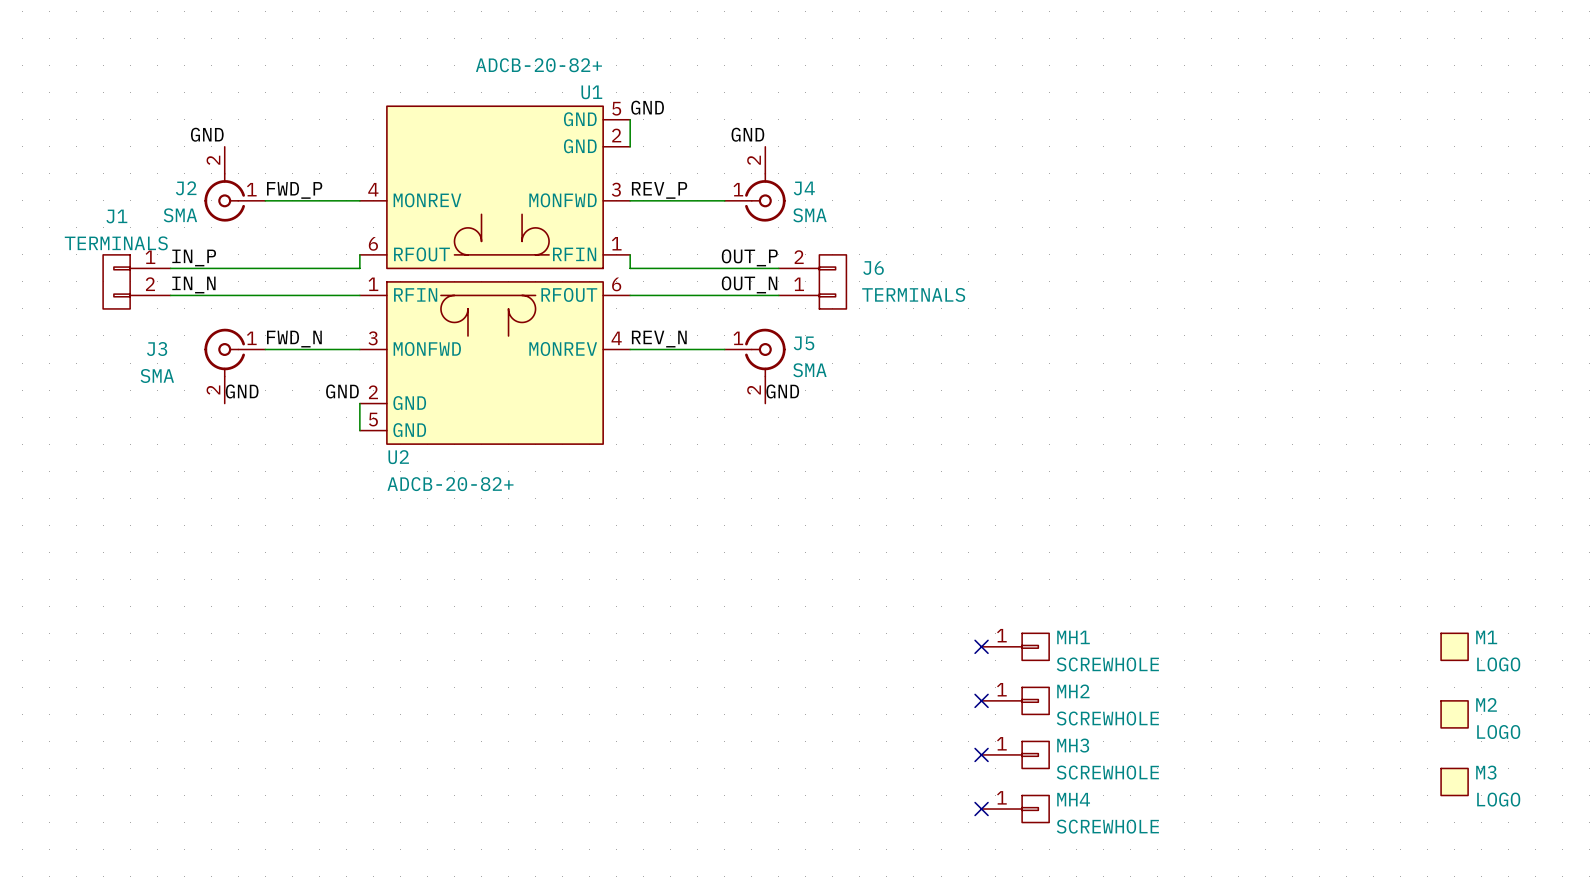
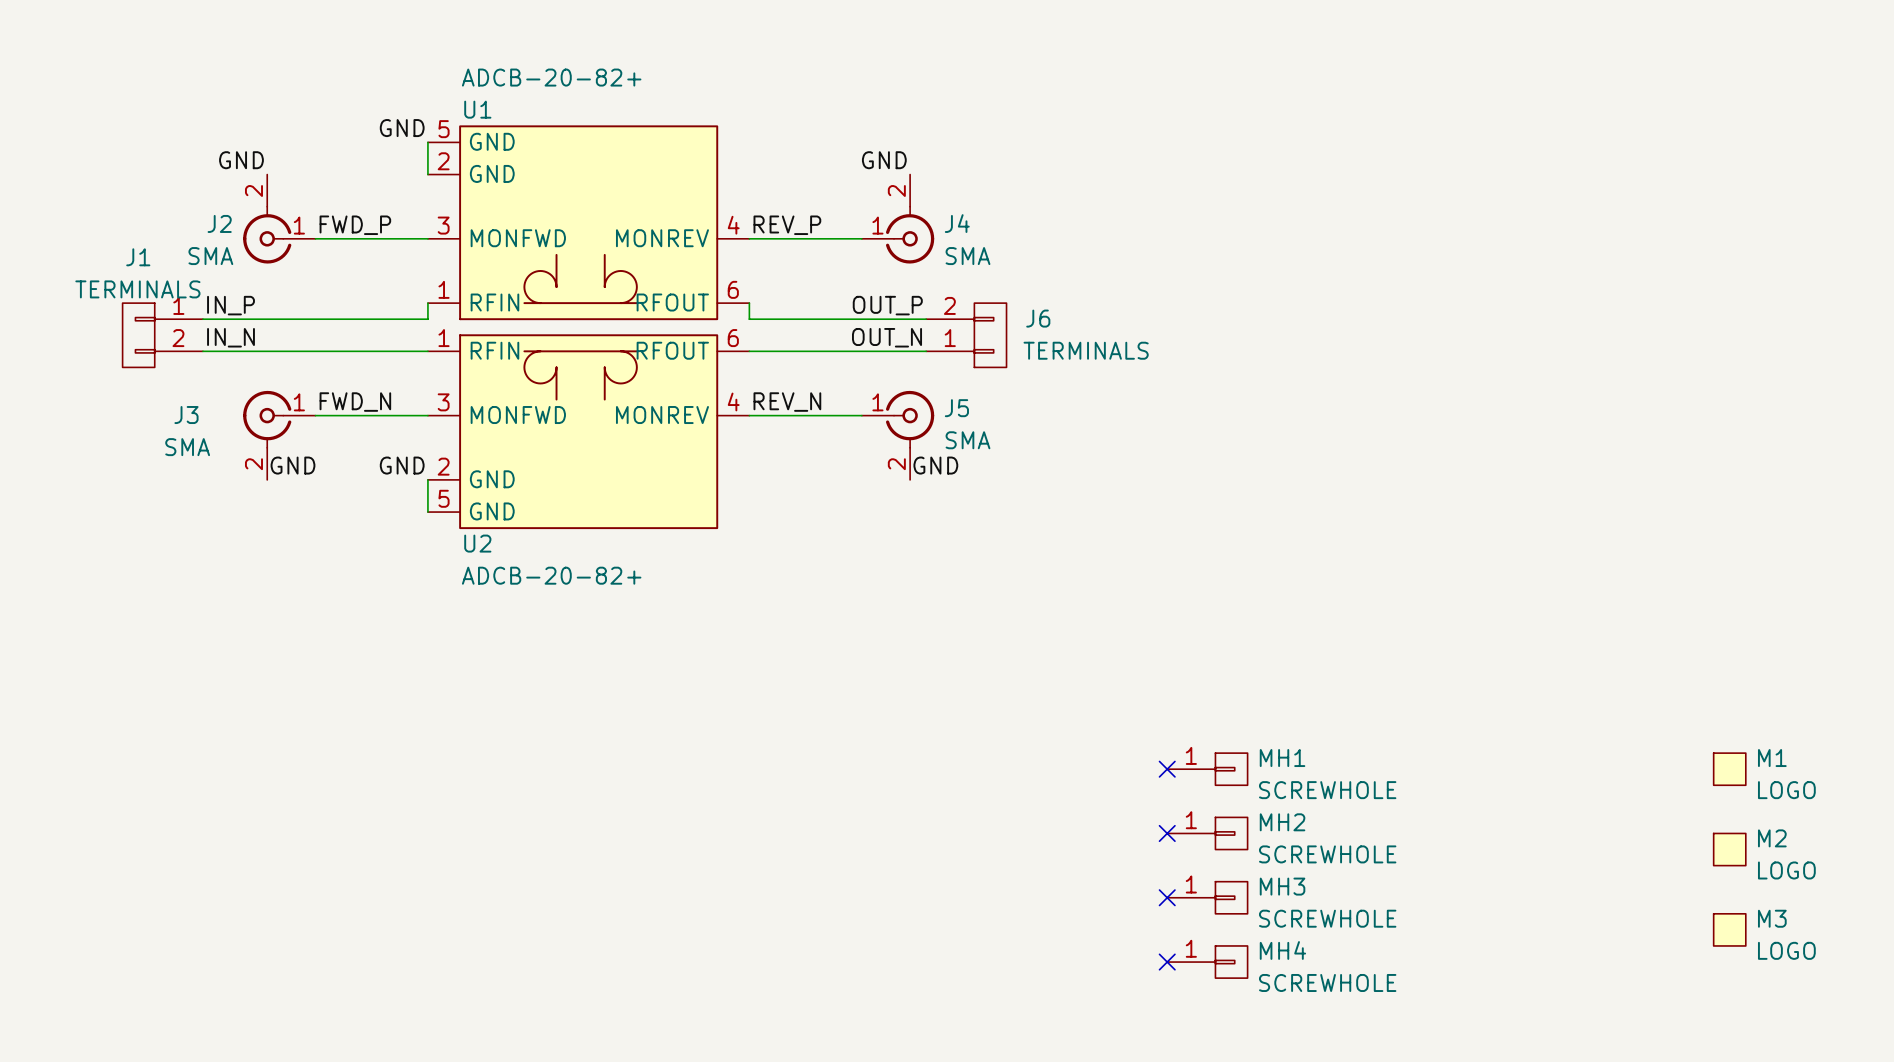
label: none -> GND (402, 128)
label: GND (647, 107) -> none
wire: none -> (427, 142) (427, 174)
wire: (630, 119) (630, 146) -> none
U1 flip: as is (495, 187) -> left-right (588, 222)

